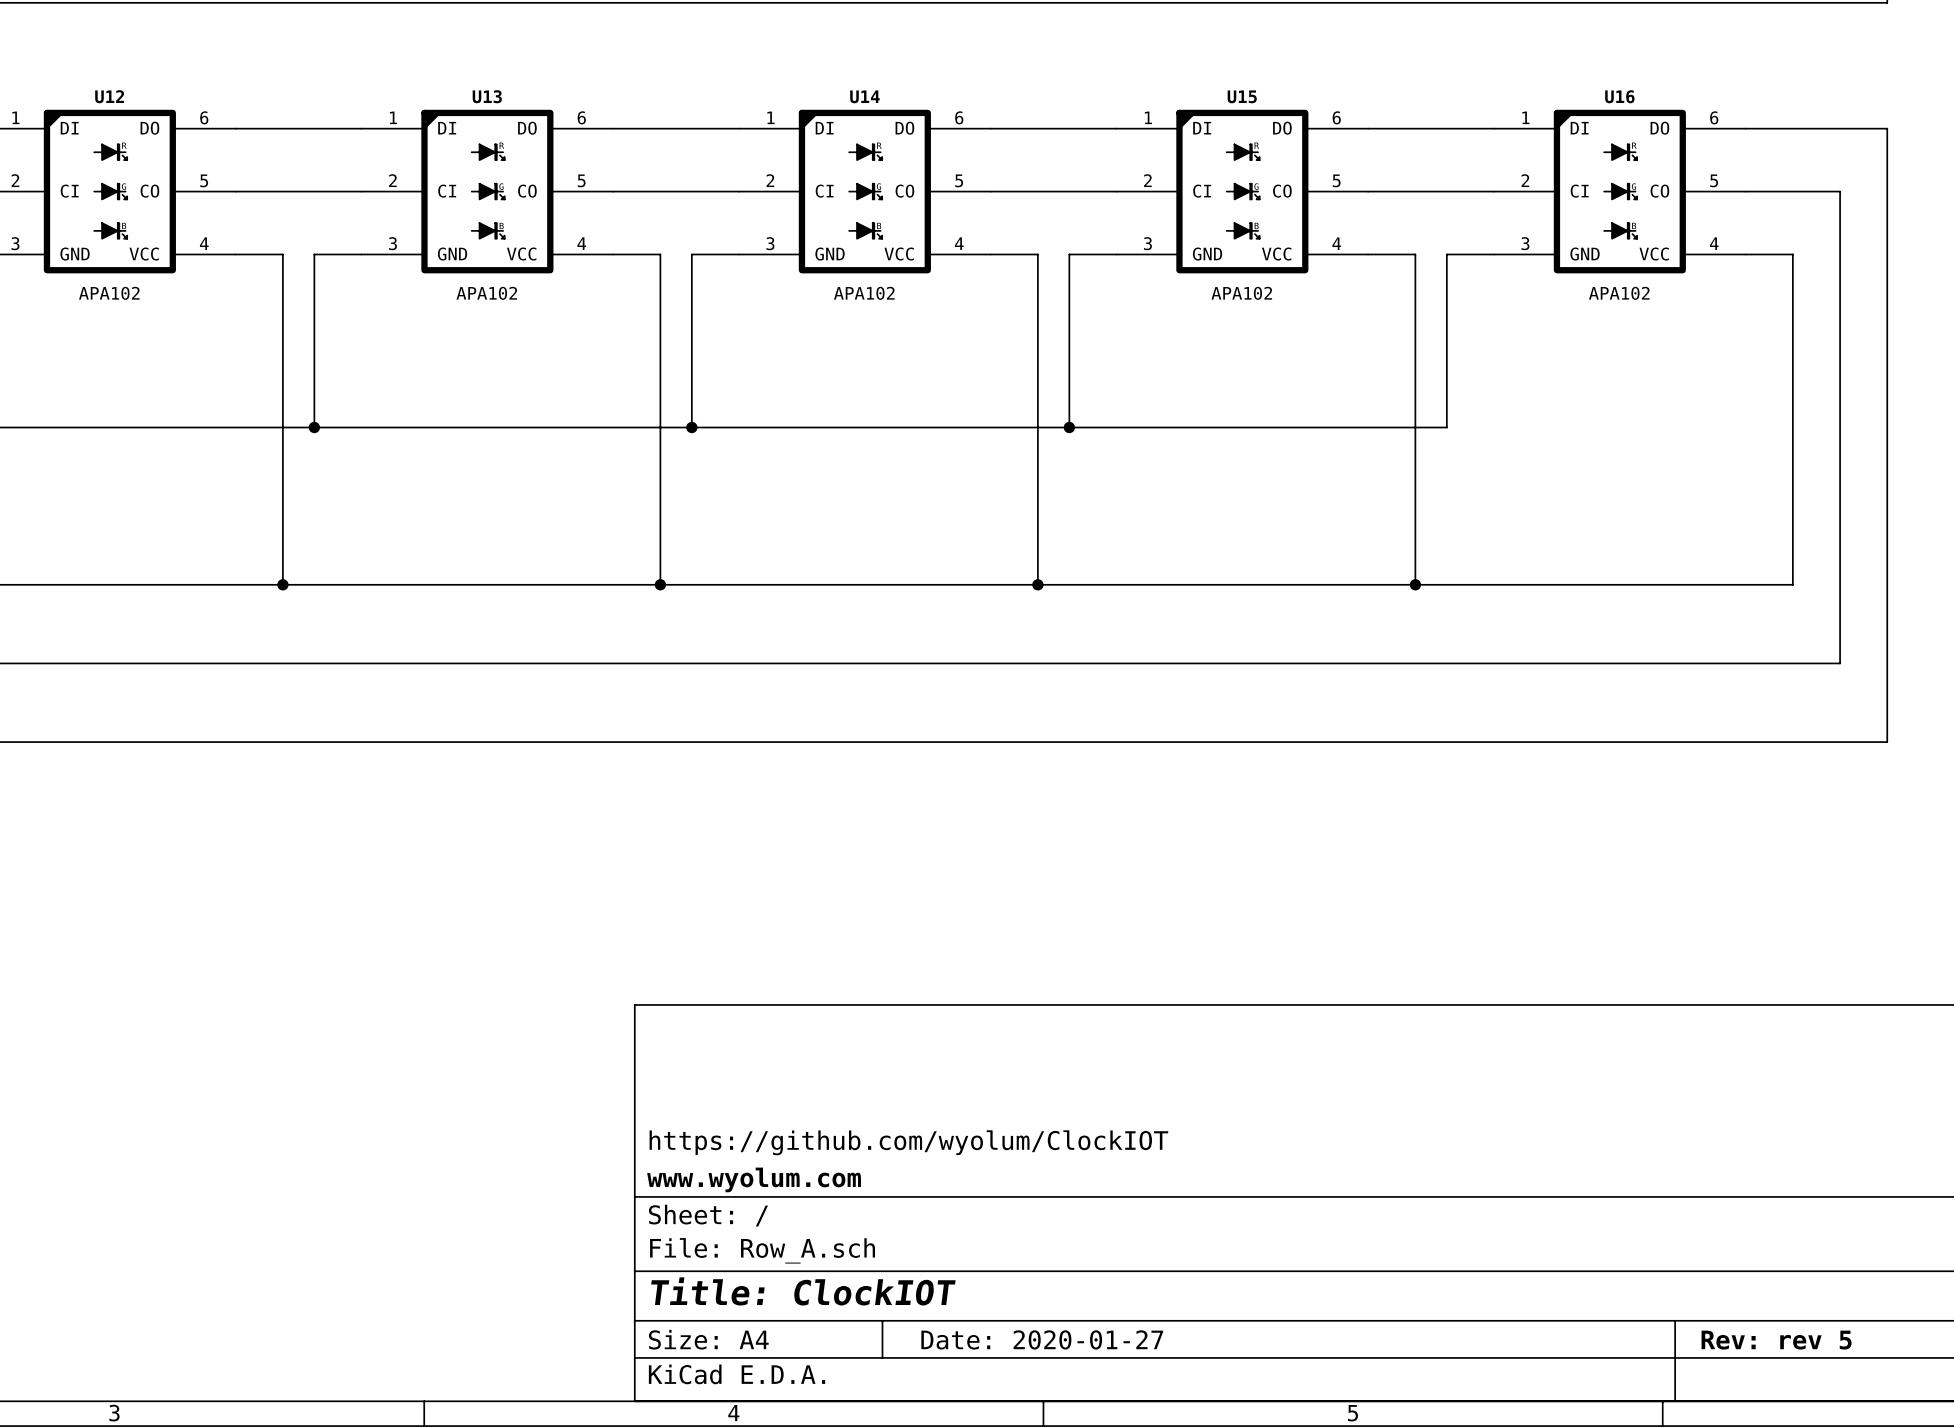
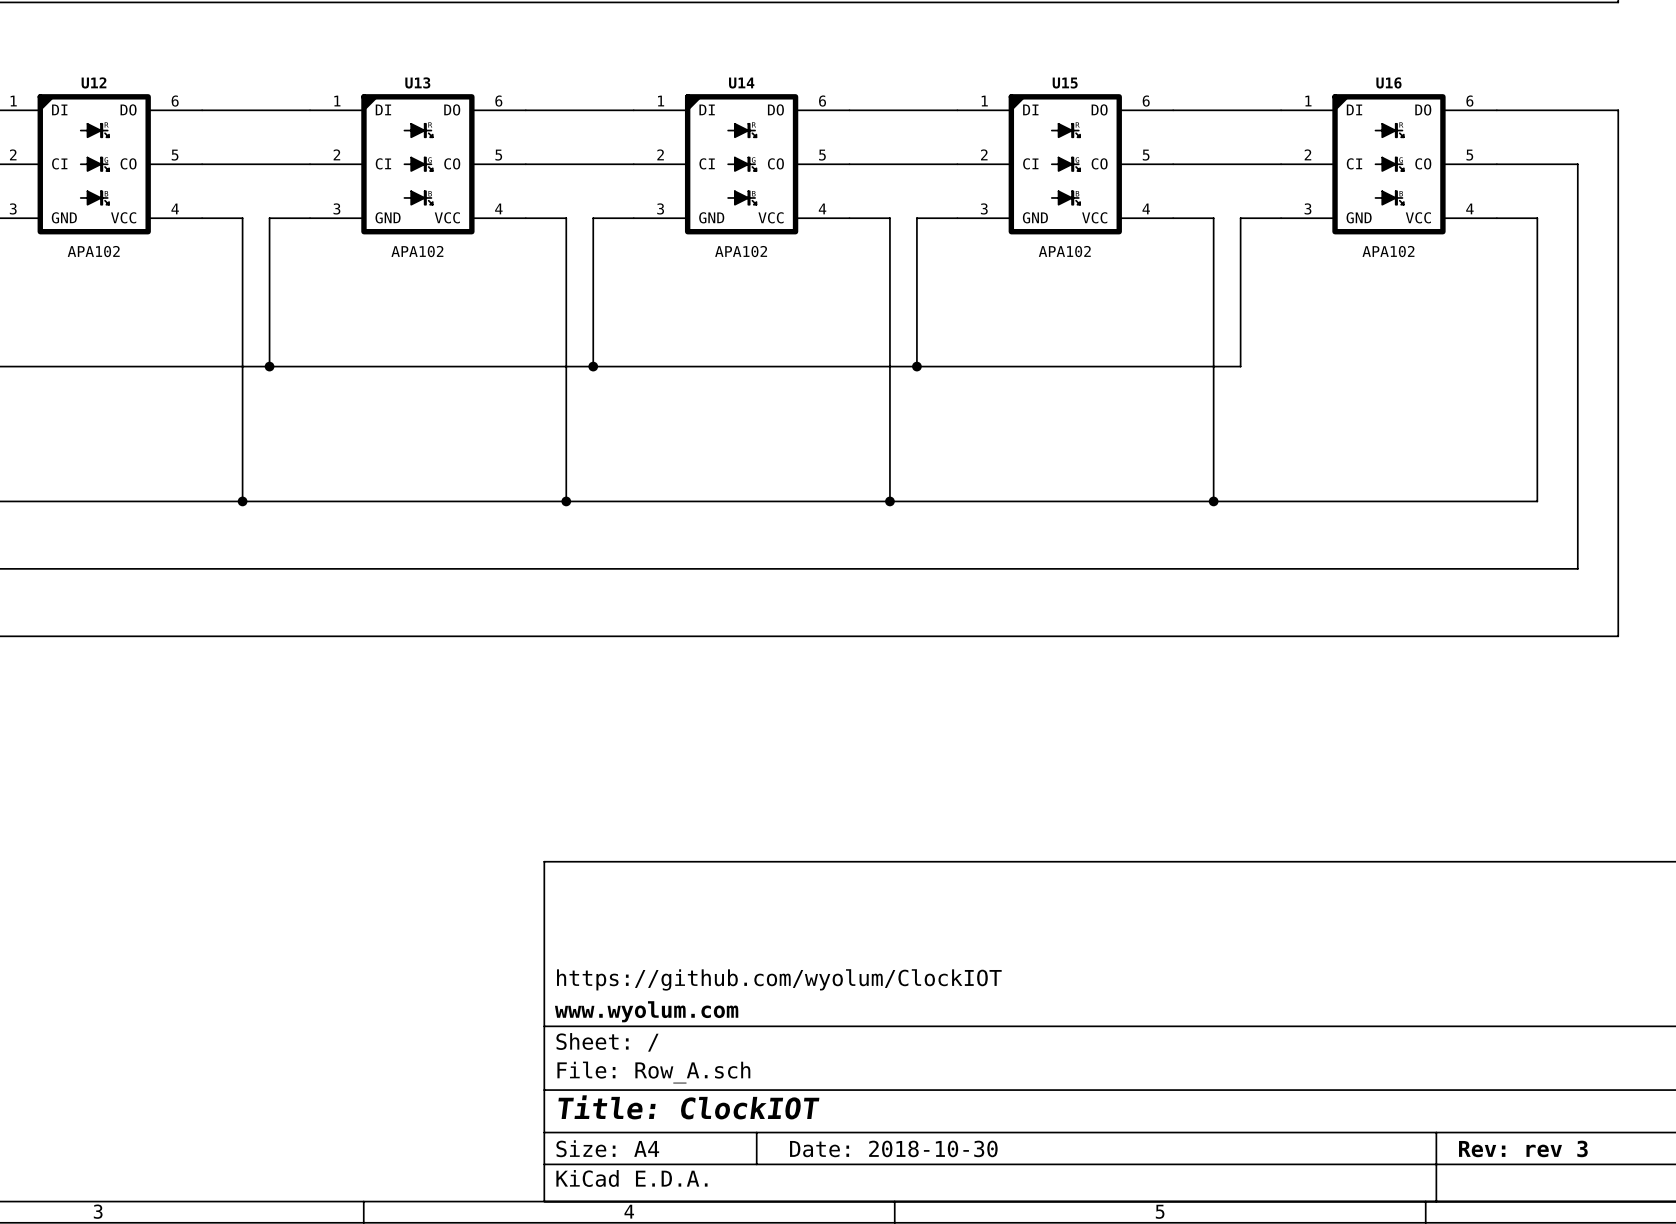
title block: Date: 2020-01-27 (1042, 1339) -> Date: 2018-10-30 (893, 1148)
title block: Rev: rev 5 (1776, 1340) -> Rev: rev 3 (1523, 1148)

